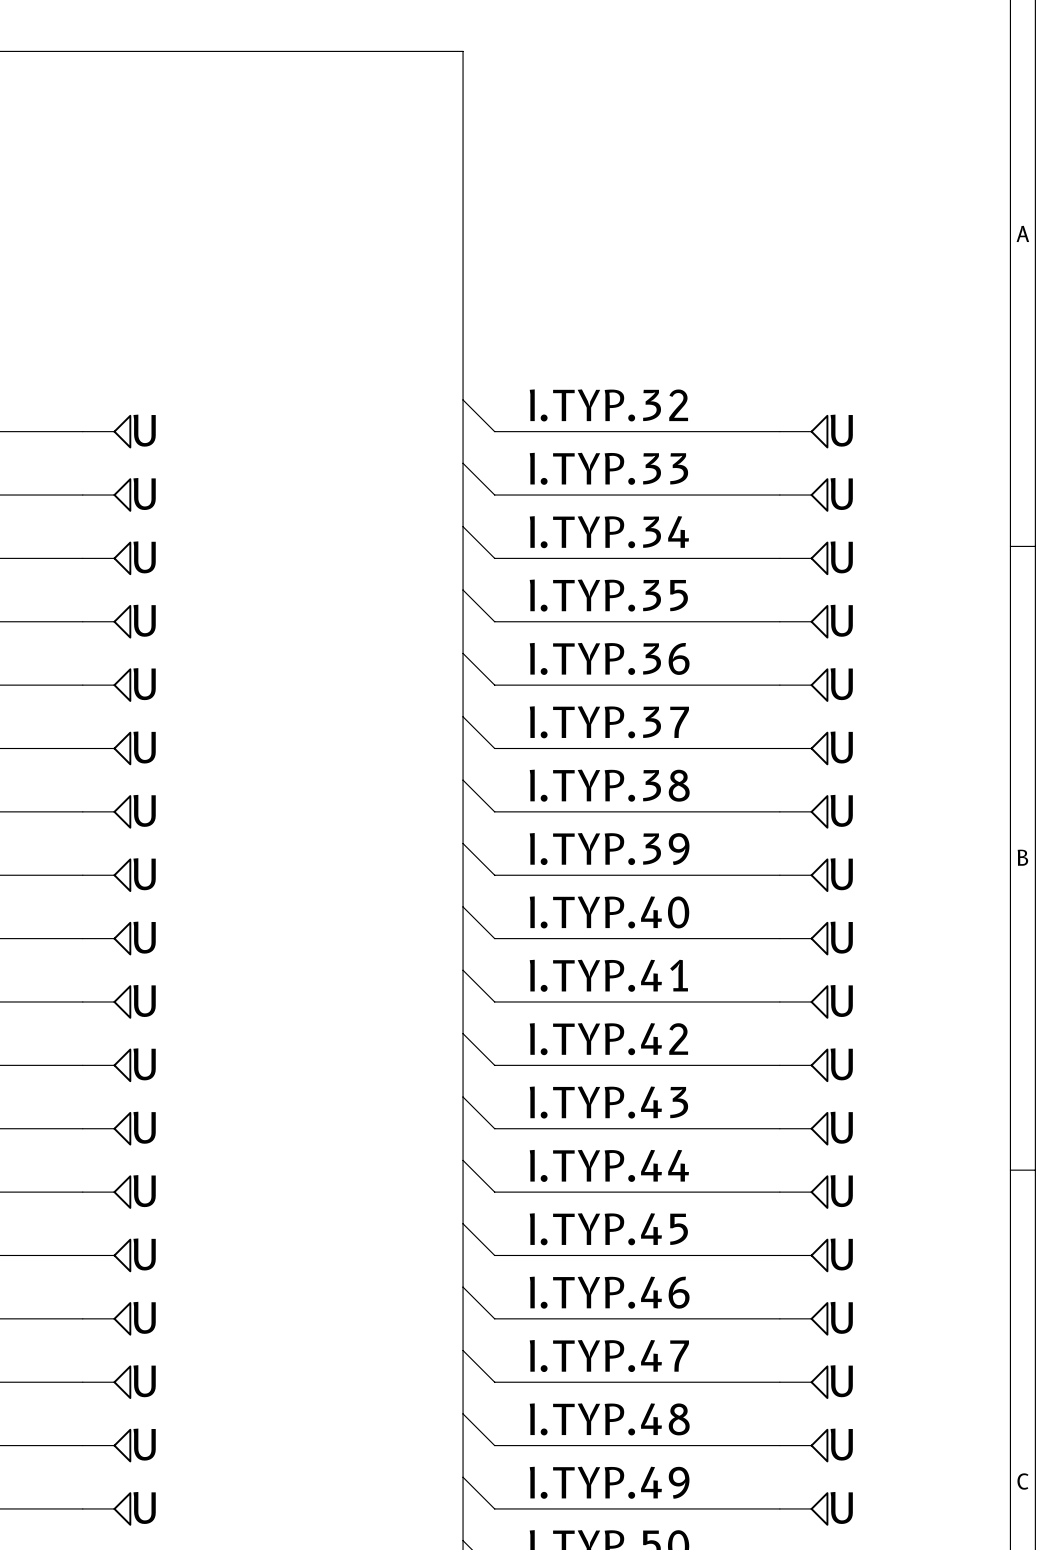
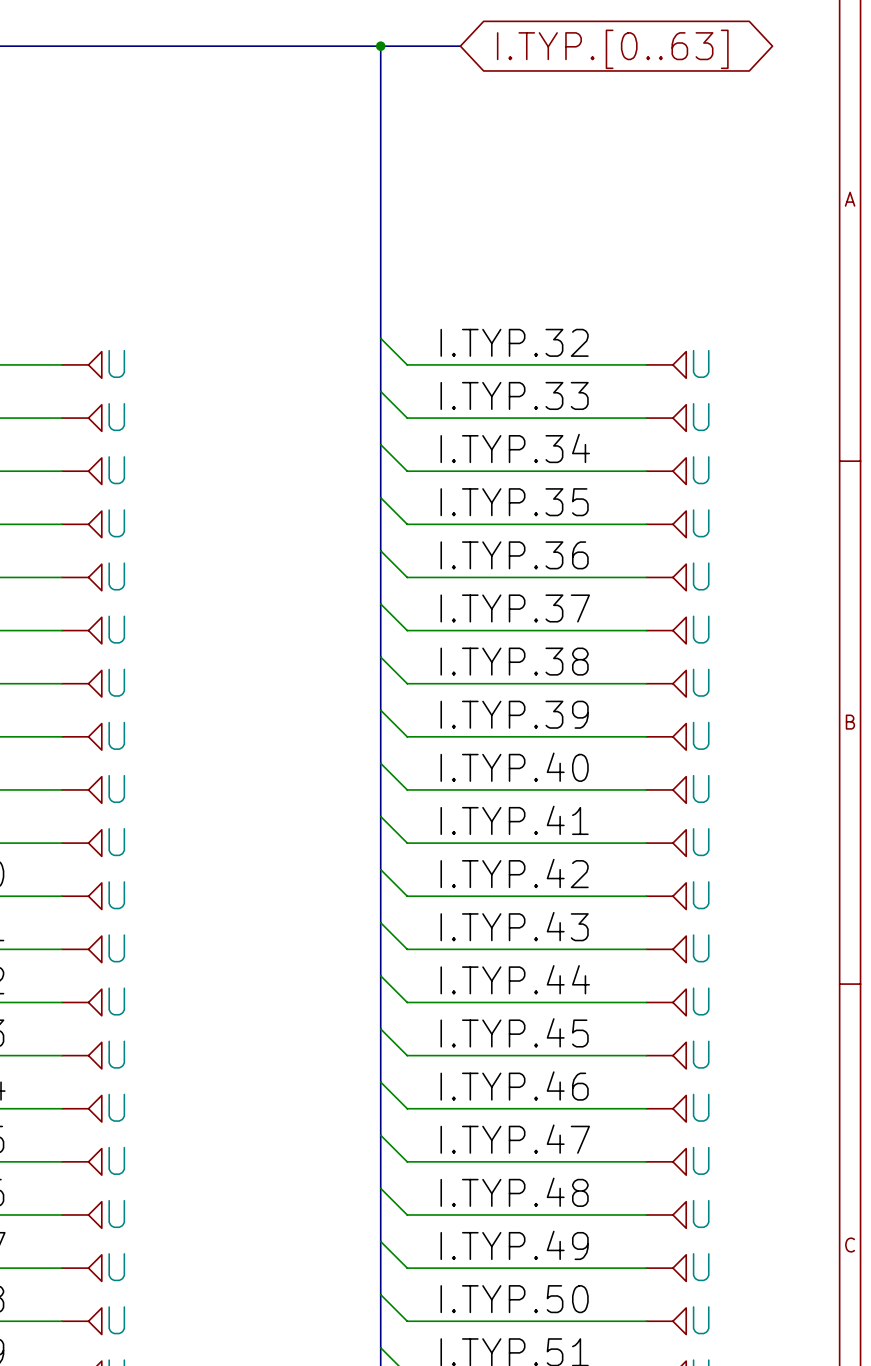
bus: none -> (380, 46) (460, 46)
junction: none -> (380, 46)
global label: none -> I.TYP.[0..63] (612, 49)

